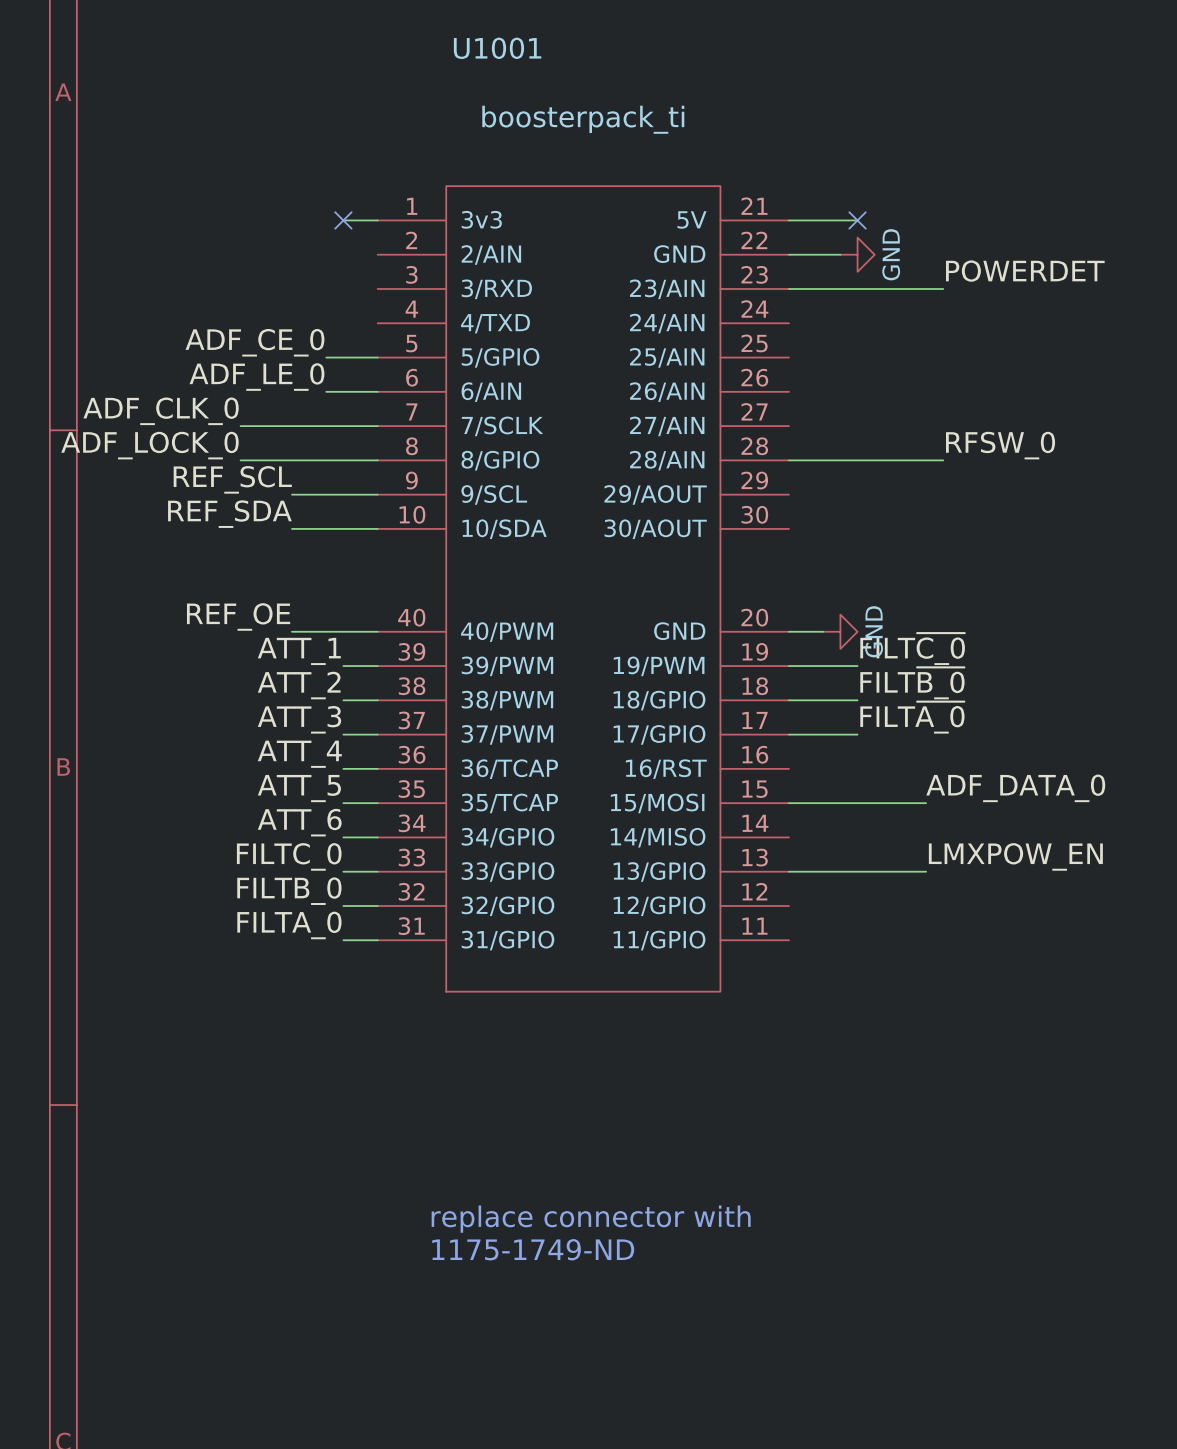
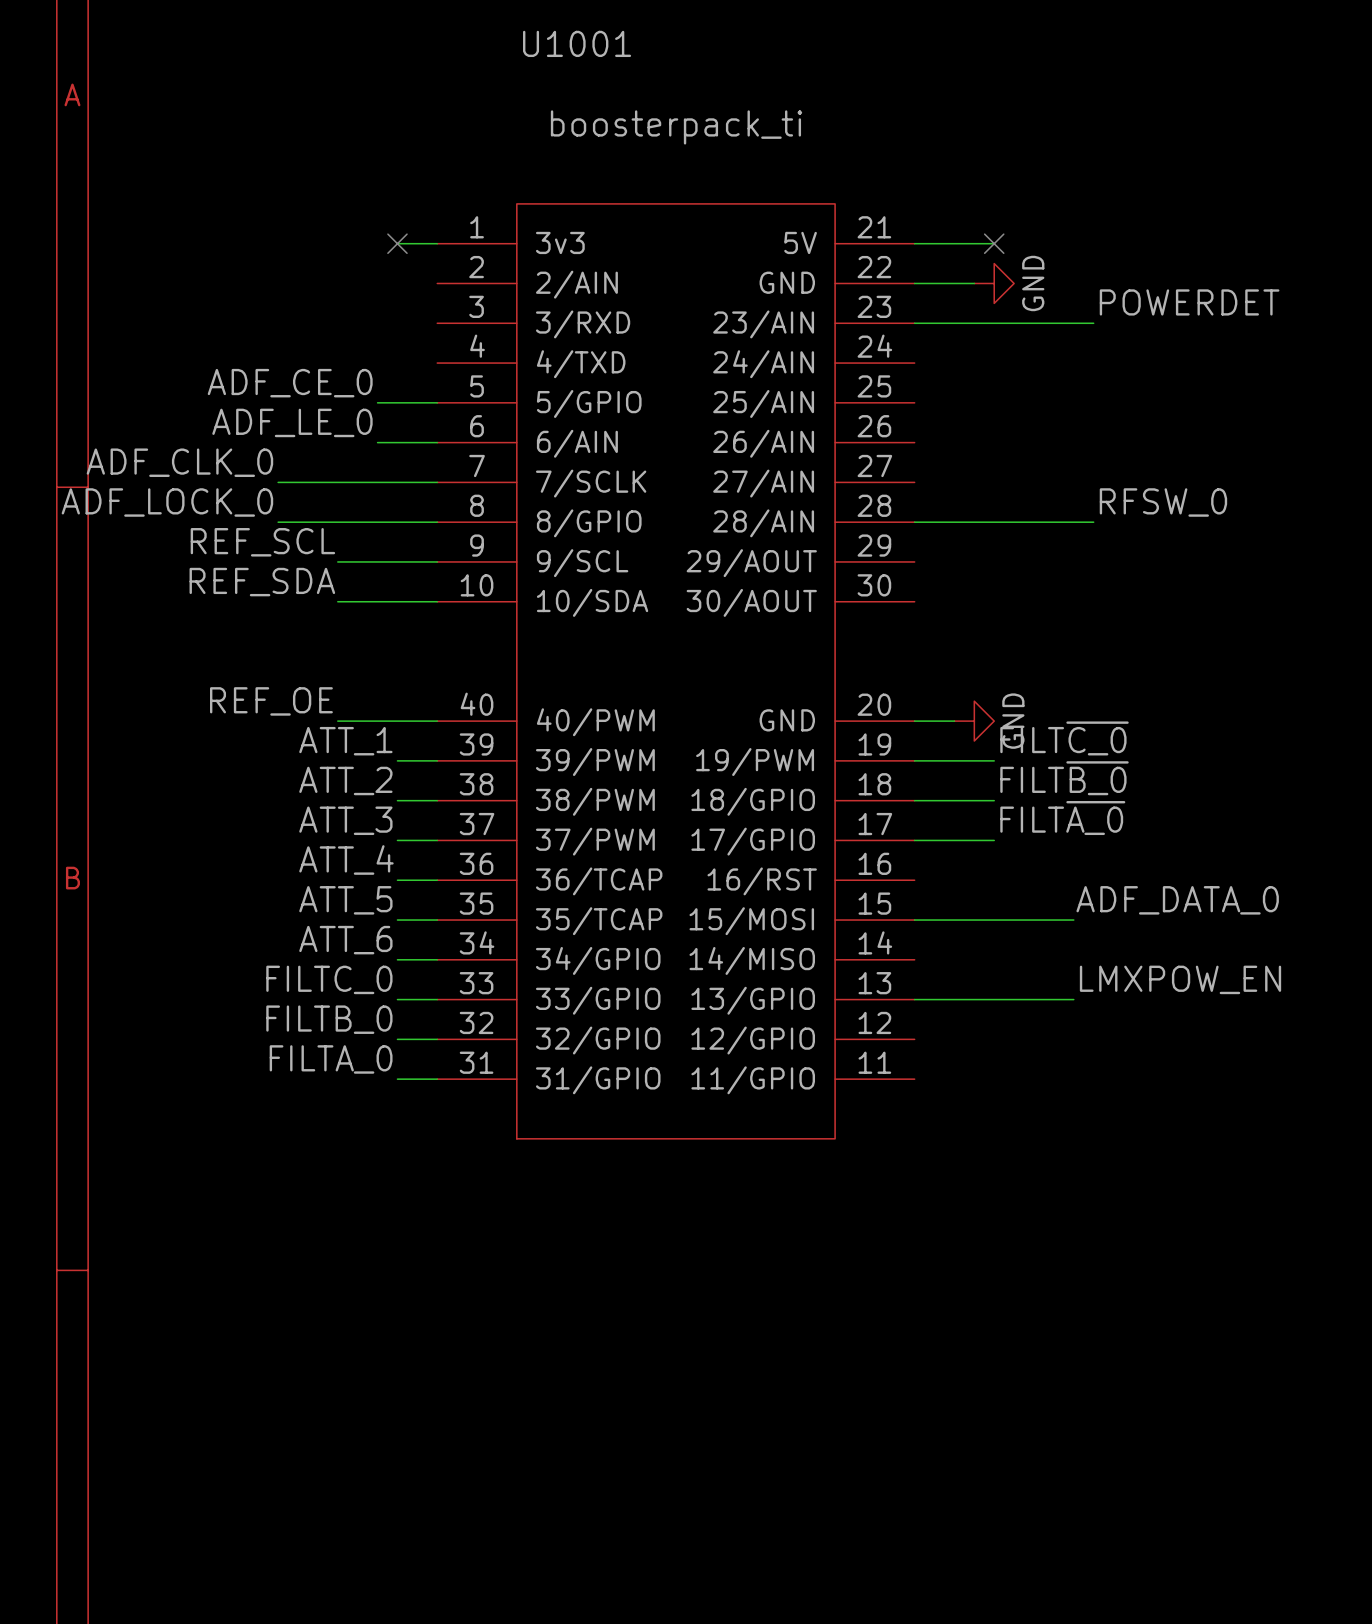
text: replace connector with (591, 1219) -> none
text: 1175-1749-ND (533, 1249) -> none

